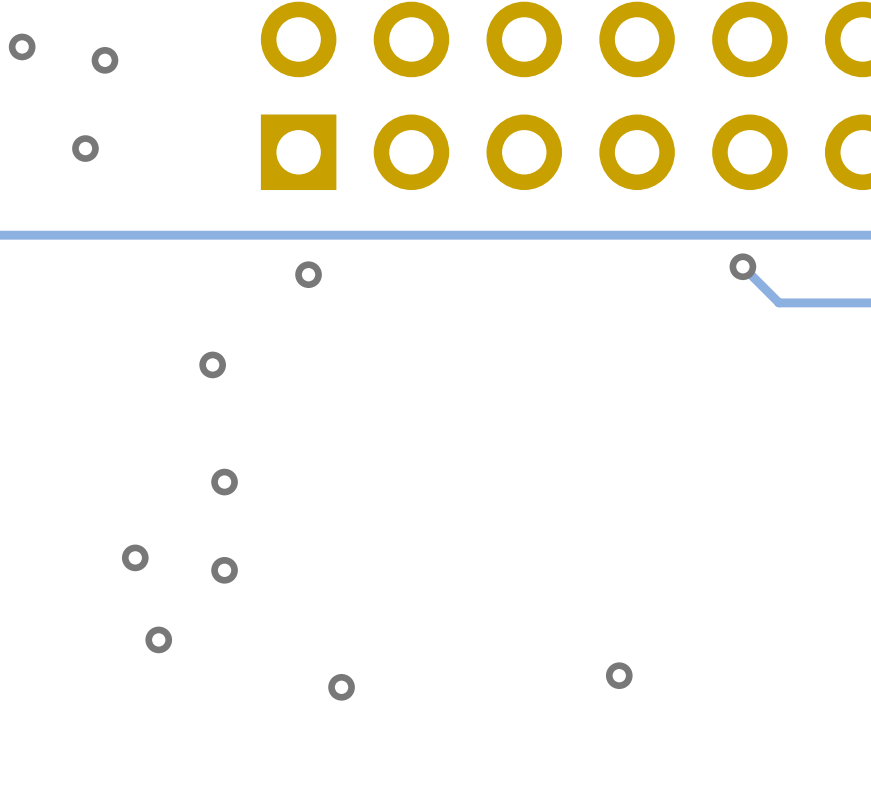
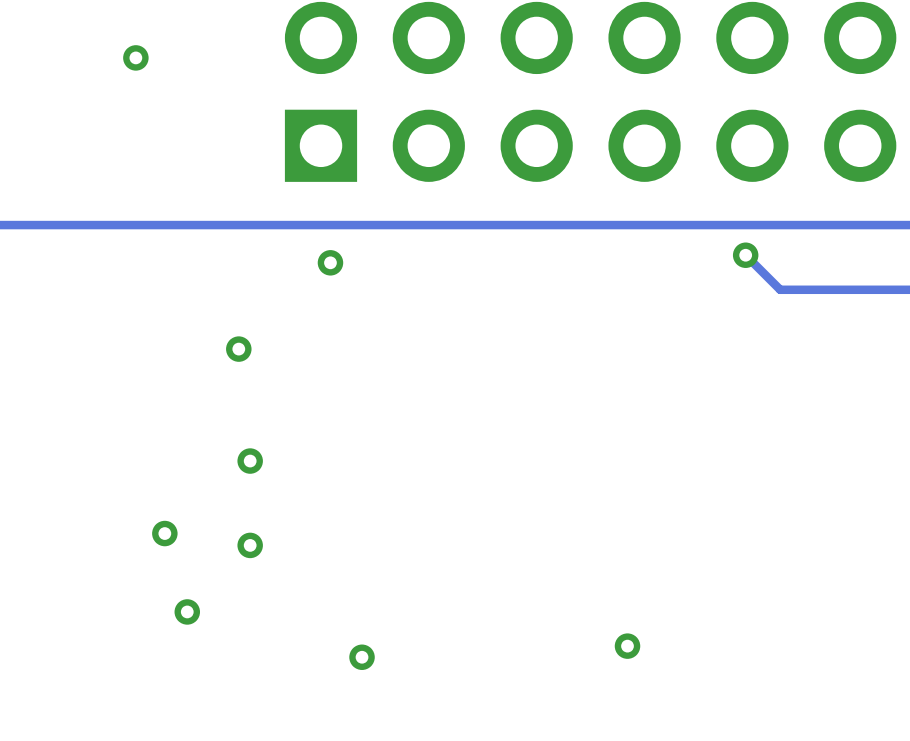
via: (22, 46) -> none
via: (85, 148) -> none

